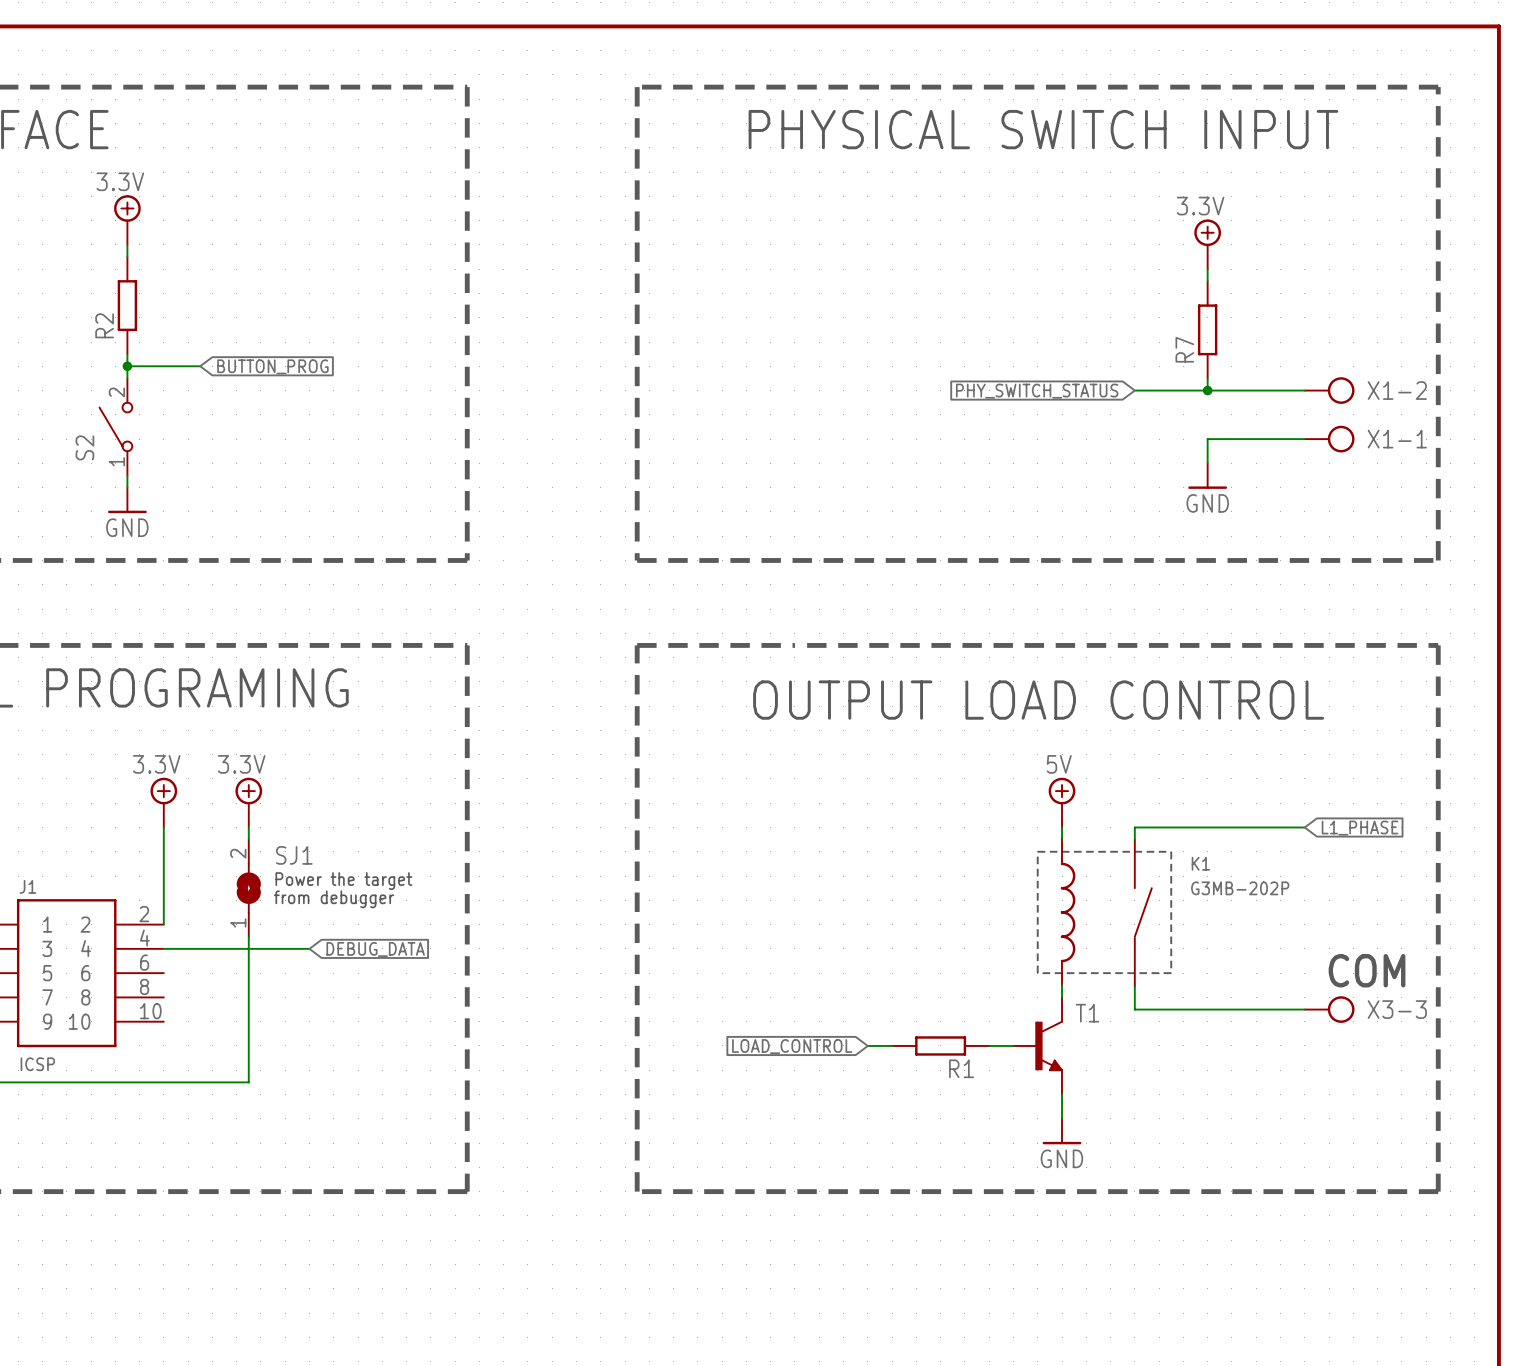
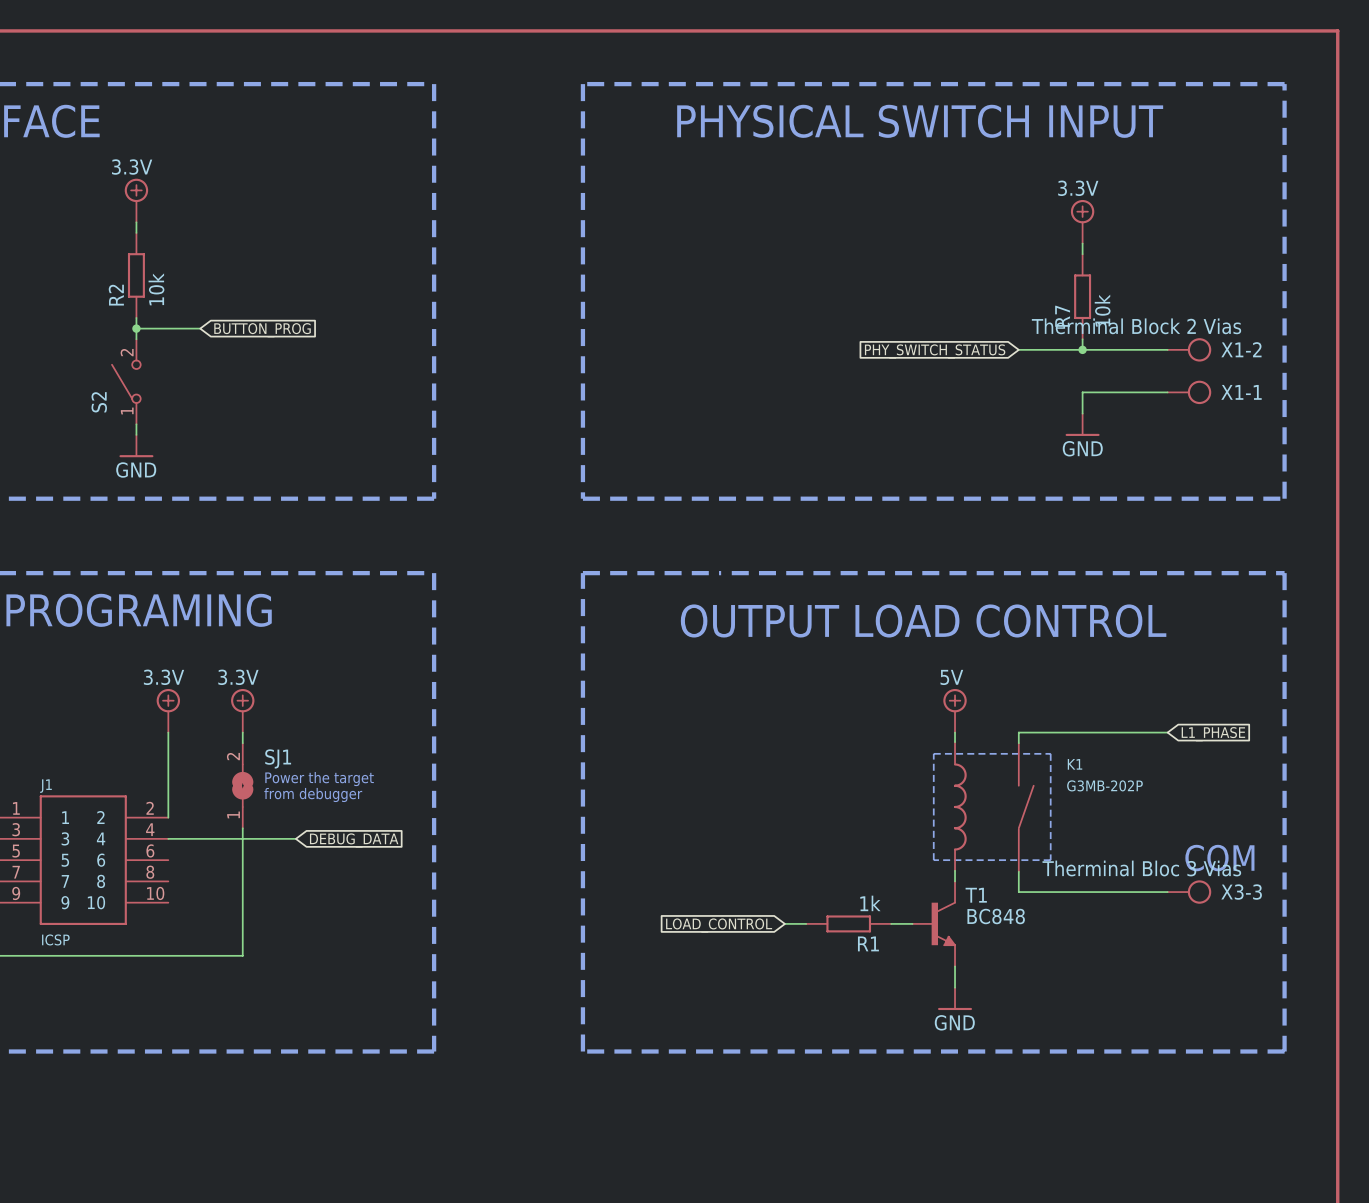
R2 value: none -> 10k (156, 289)
R7 value: none -> 10k (1102, 310)
X1-2 value: none -> Therminal Block 2 Vias (1136, 326)
X3-3 value: none -> Therminal Bloc 3 Vias (1141, 868)
R1 value: none -> 1k (870, 903)
T1 value: none -> BC848 (996, 916)

